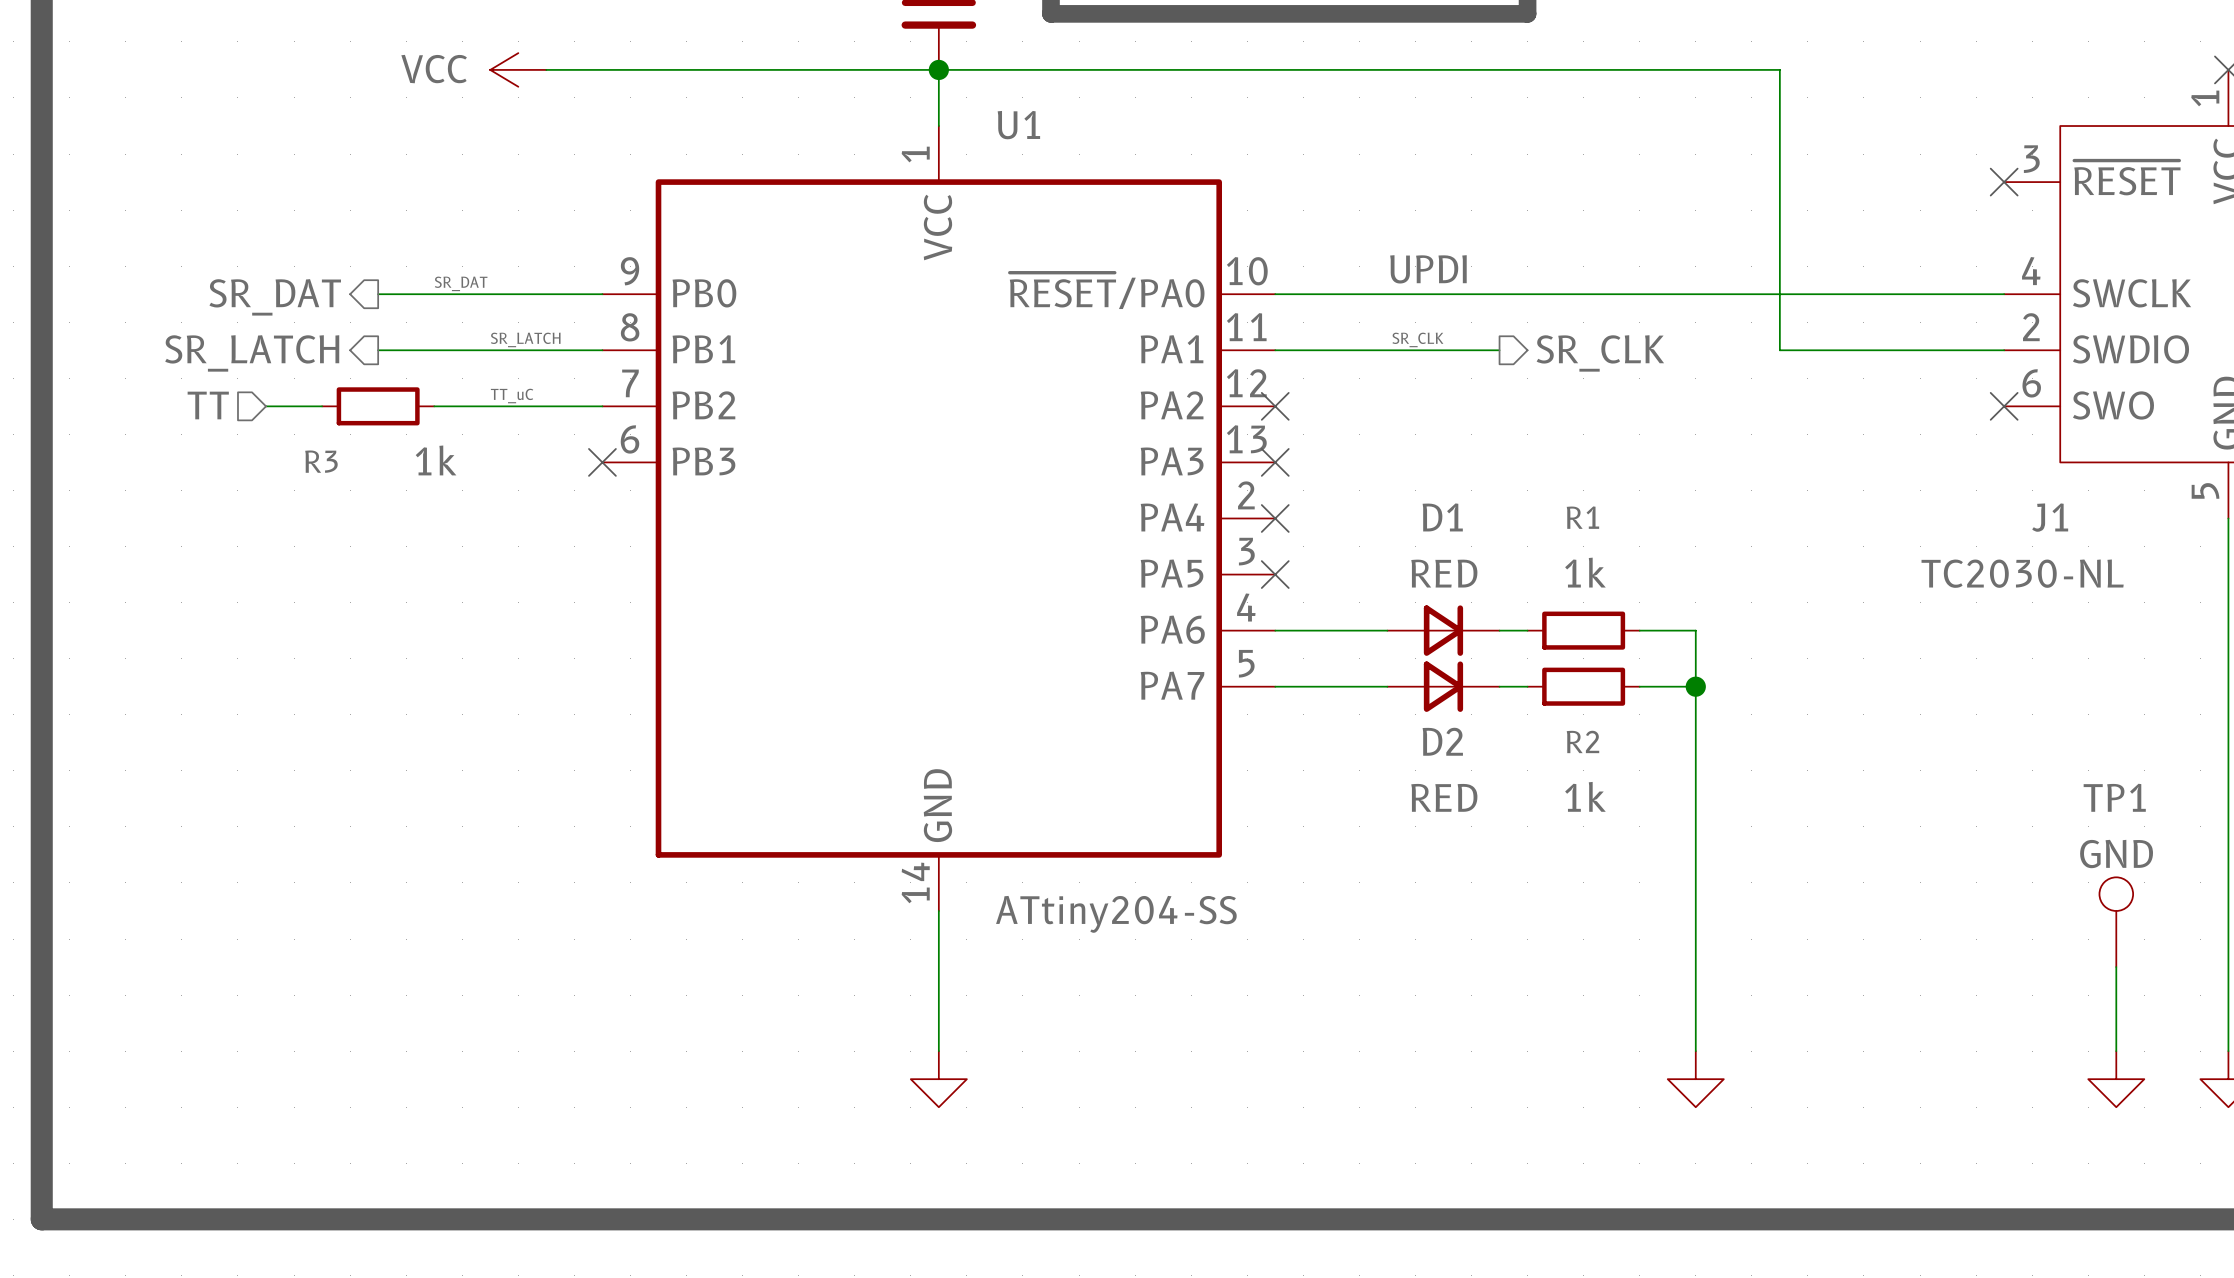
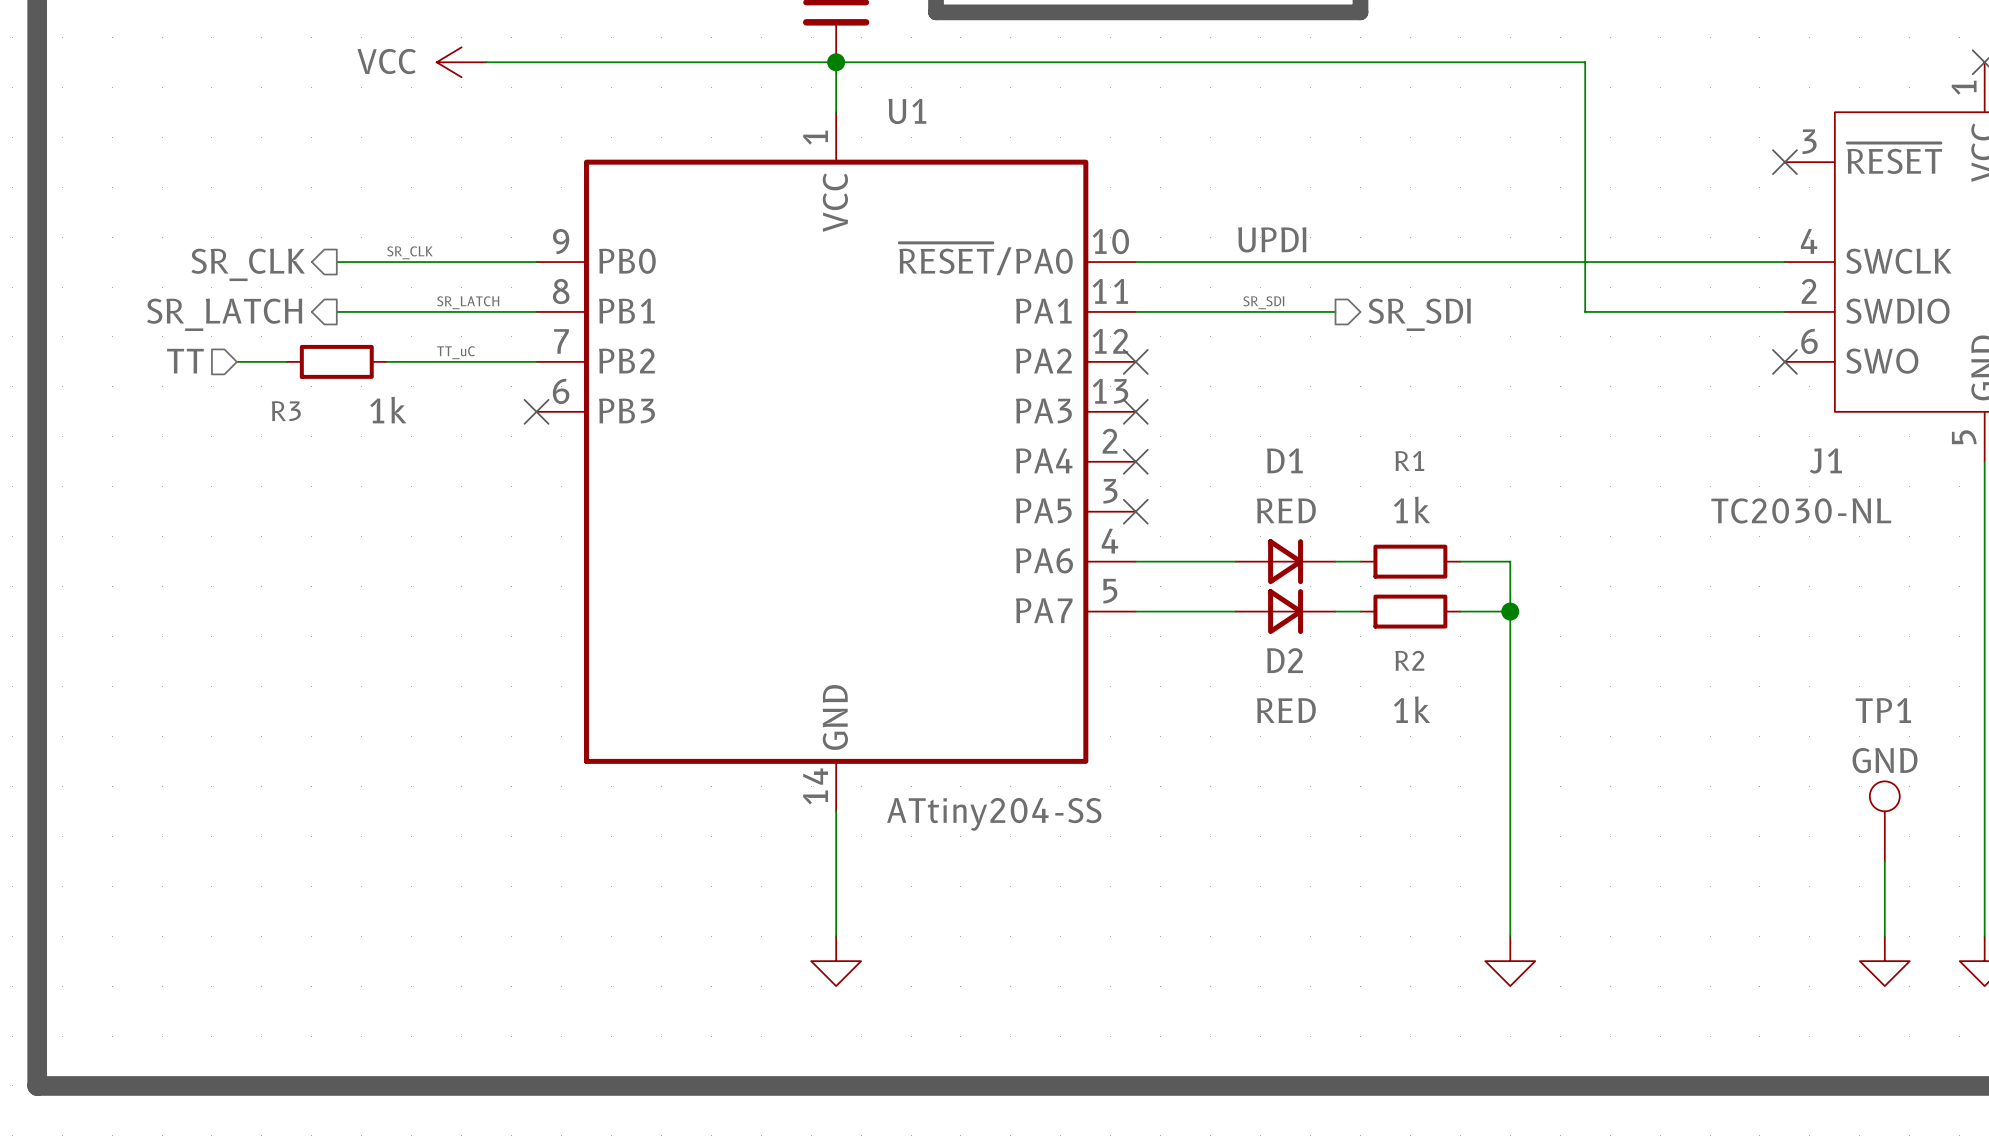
label: SR_DAT (461, 283) -> SR_CLK (409, 252)
hierarchical label: SR_DAT (275, 297) -> SR_CLK (248, 264)
label: SR_CLK (1417, 339) -> SR_SDI (1263, 302)
hierarchical label: SR_CLK (1600, 353) -> SR_SDI (1419, 314)

